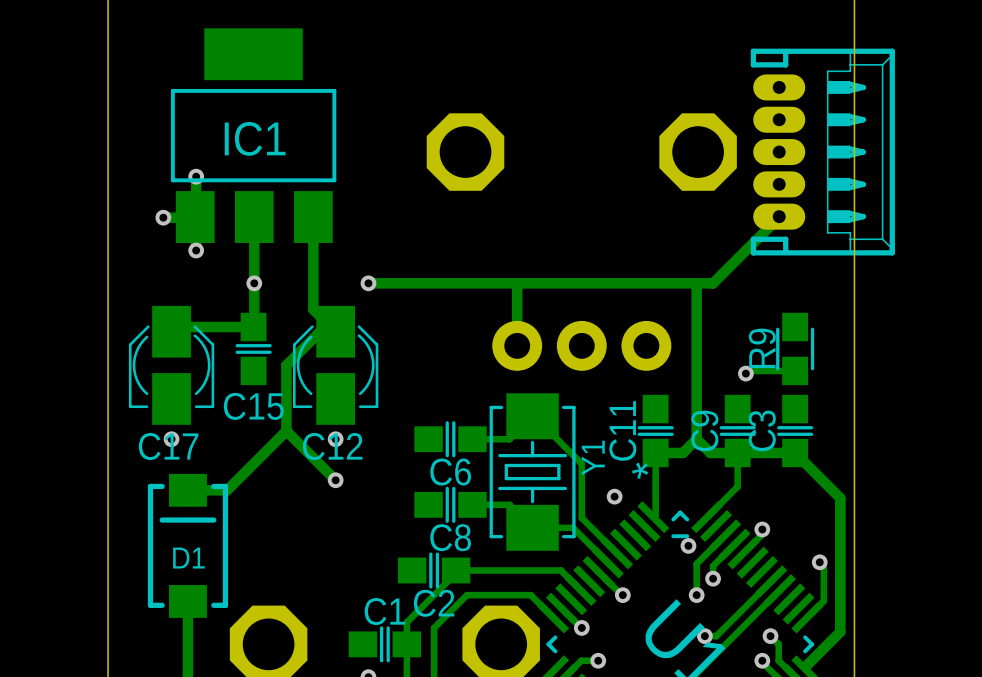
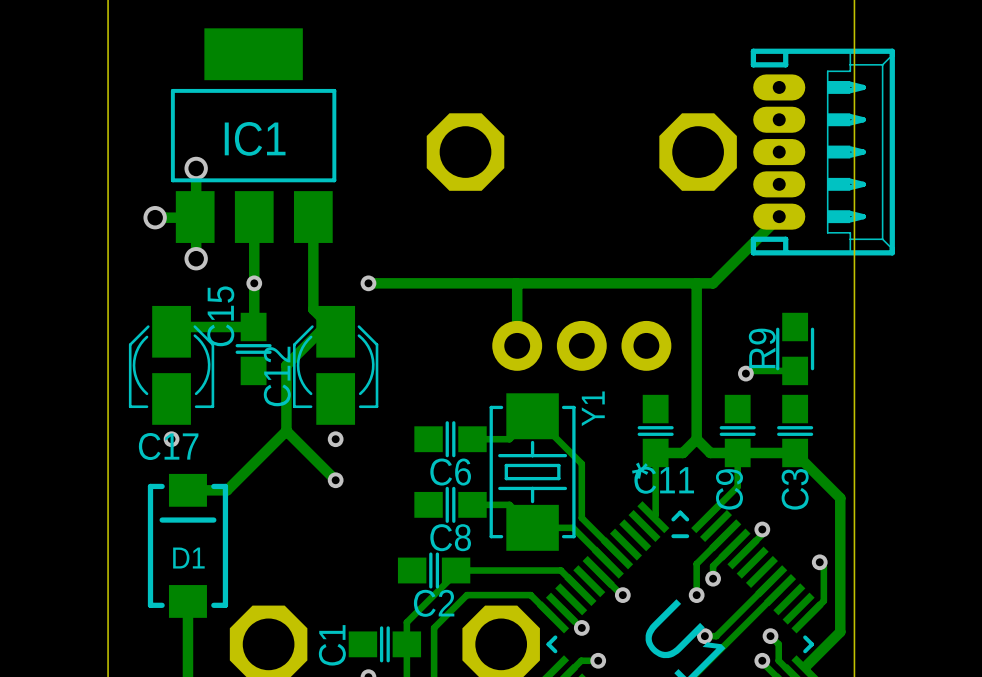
via size: [188, 168, 205, 185] -> [184, 156, 208, 181]
via size: [155, 209, 172, 226] -> [143, 206, 167, 230]
via size: [188, 242, 205, 259] -> [184, 247, 208, 271]
C15 name rotation: 0° (253, 406) -> 90° counterclockwise (220, 316)
C15 name position: C15 (253, 406) -> C15 (220, 316)
C11 name rotation: 0° (622, 430) -> 90° clockwise (664, 480)
C9 name position: C9 (704, 430) -> C9 (729, 489)
C3 name position: C3 (762, 430) -> C3 (795, 489)
C12 name rotation: 0° (332, 446) -> 90° counterclockwise (277, 376)
C12 name position: C12 (332, 446) -> C12 (277, 376)
Y1 name position: Y1 (593, 458) -> Y1 (593, 408)
via: (614, 496) -> none
via: (688, 545) -> none
C1 name rotation: 0° (384, 611) -> 90° counterclockwise (332, 645)

